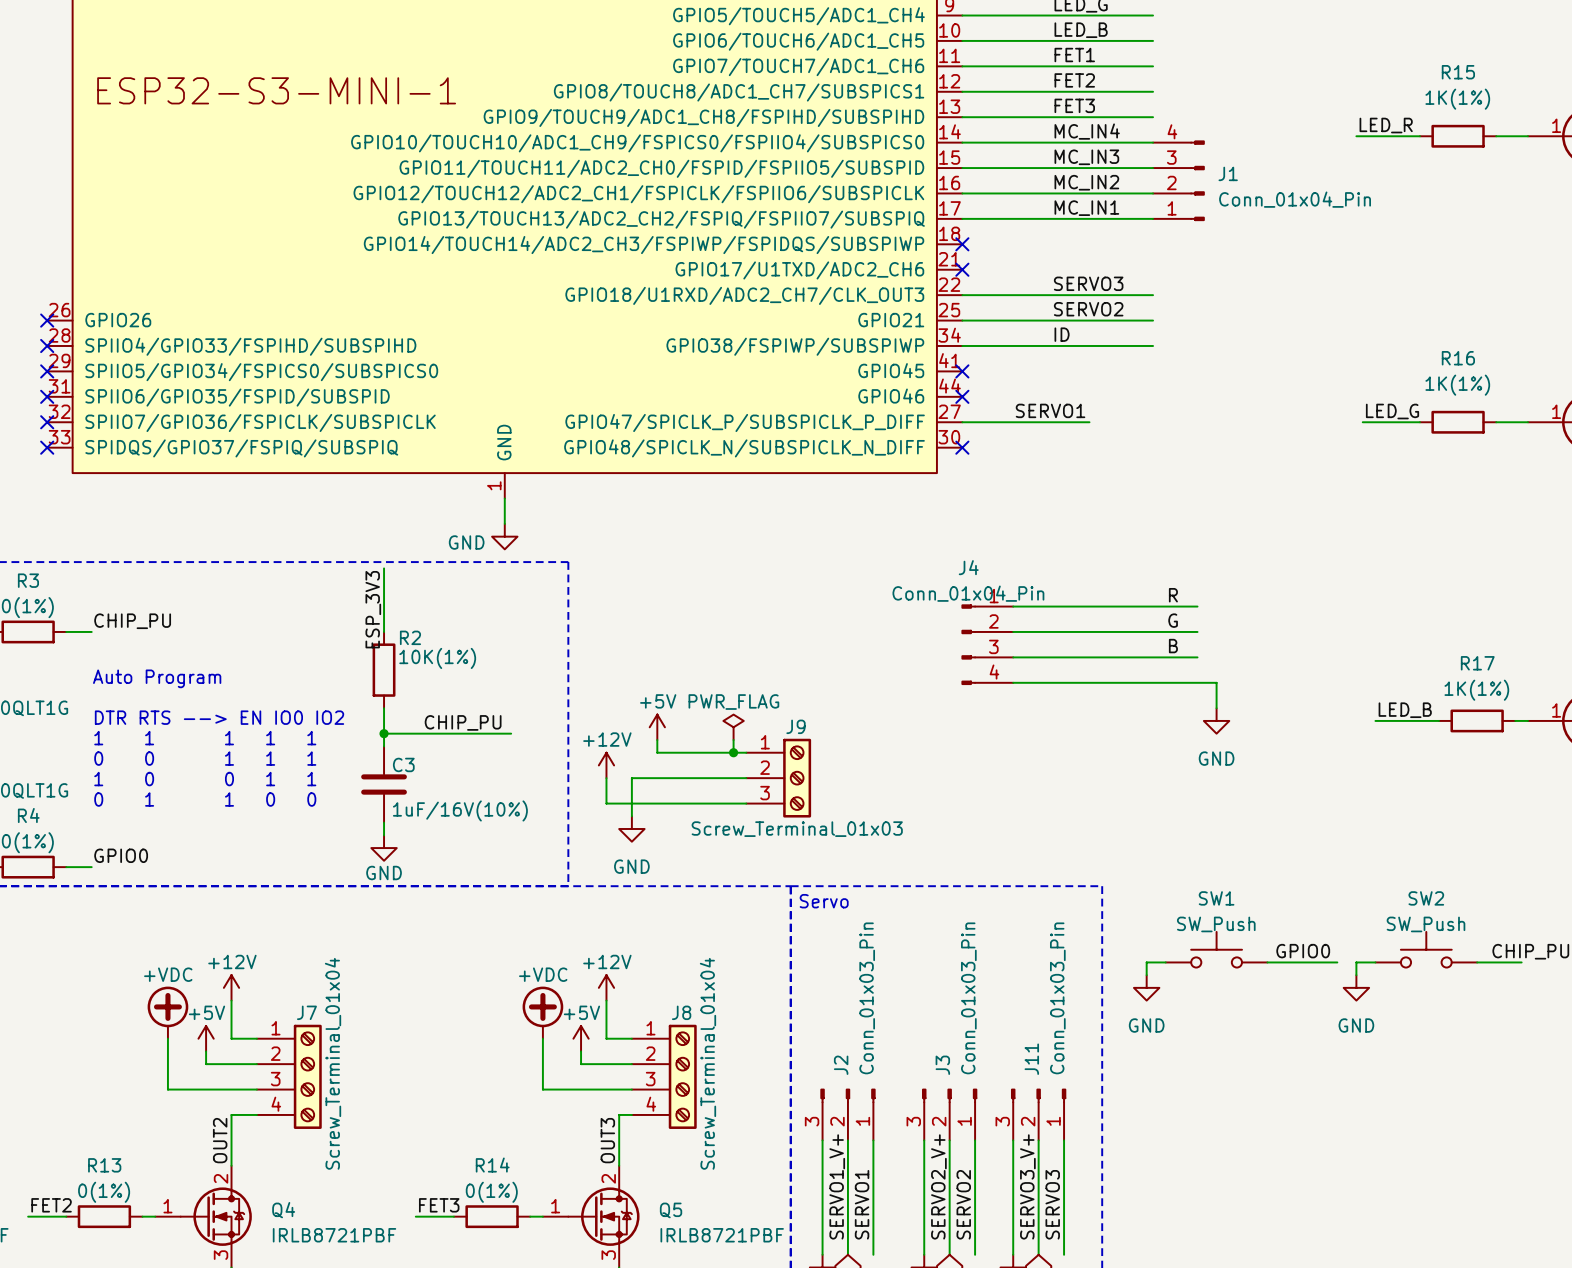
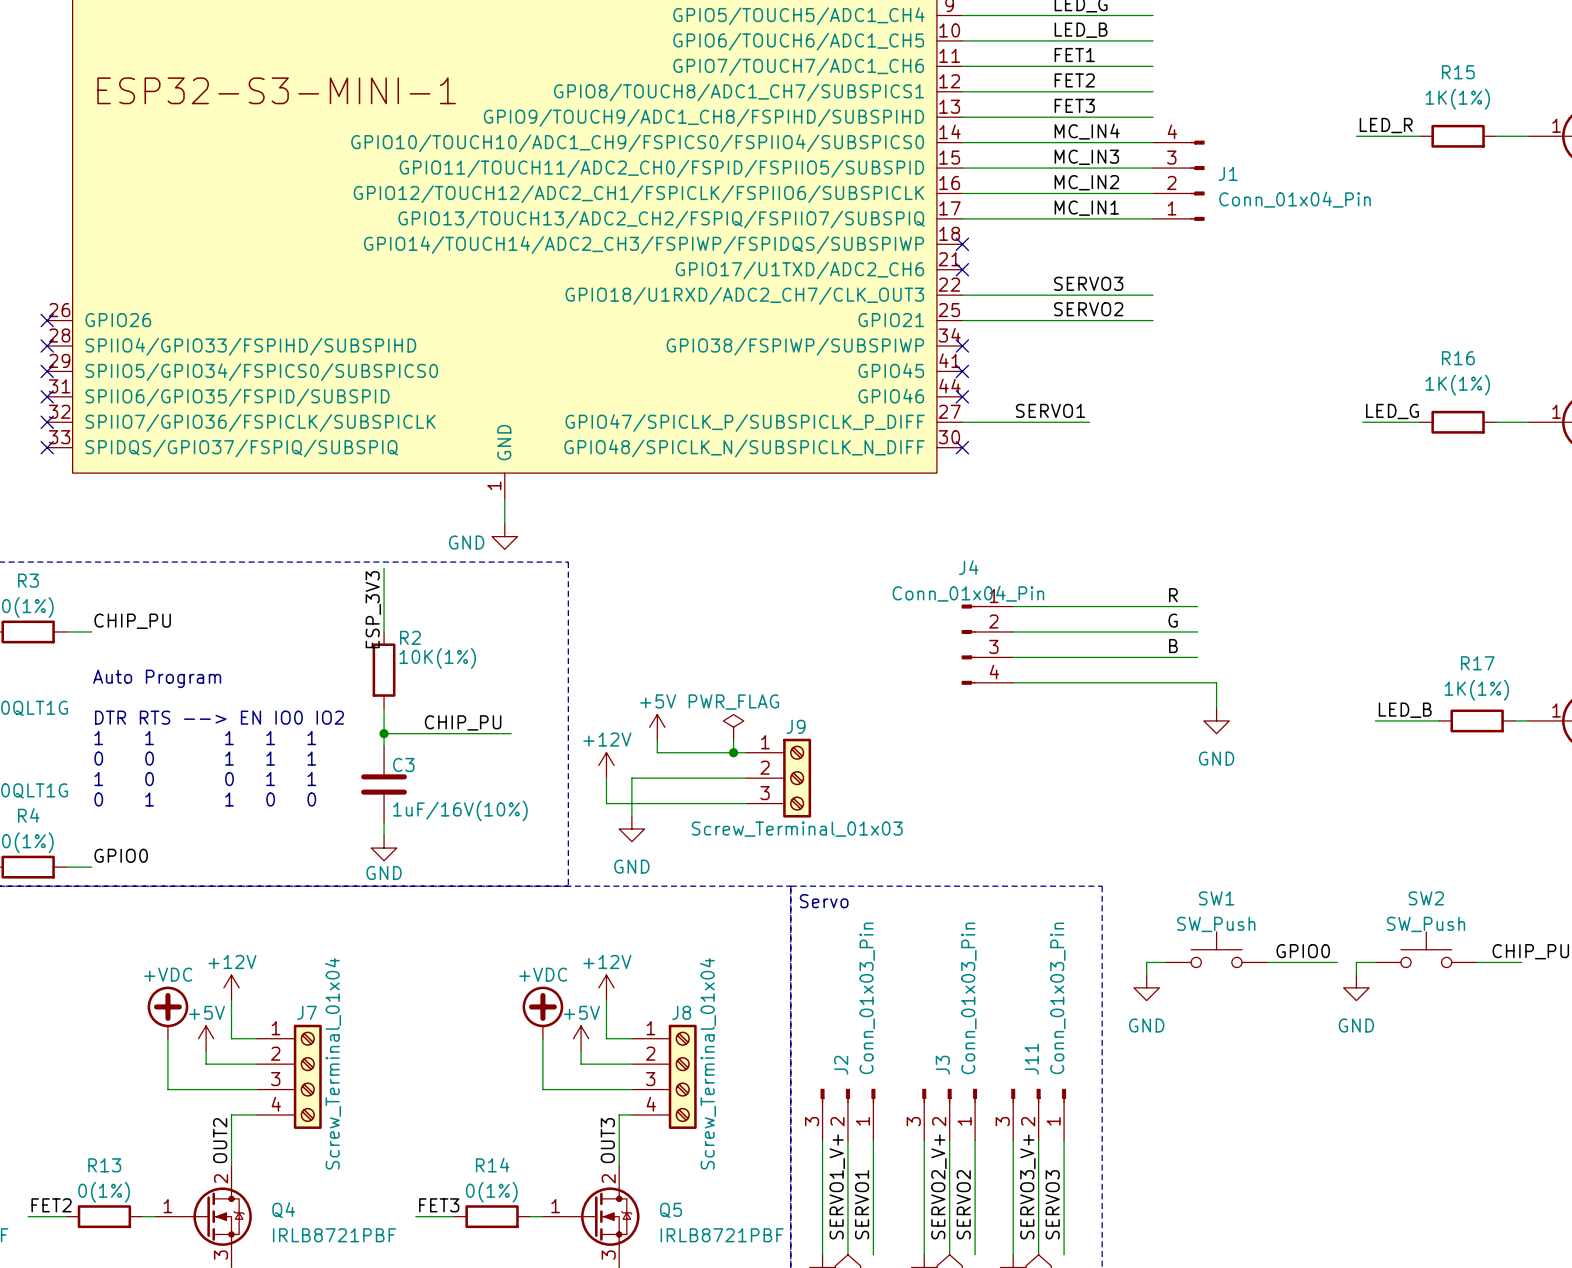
label: ID (1062, 334) -> none
wire: (962, 345) (1153, 345) -> none
no-connect mark: none -> (962, 345)

